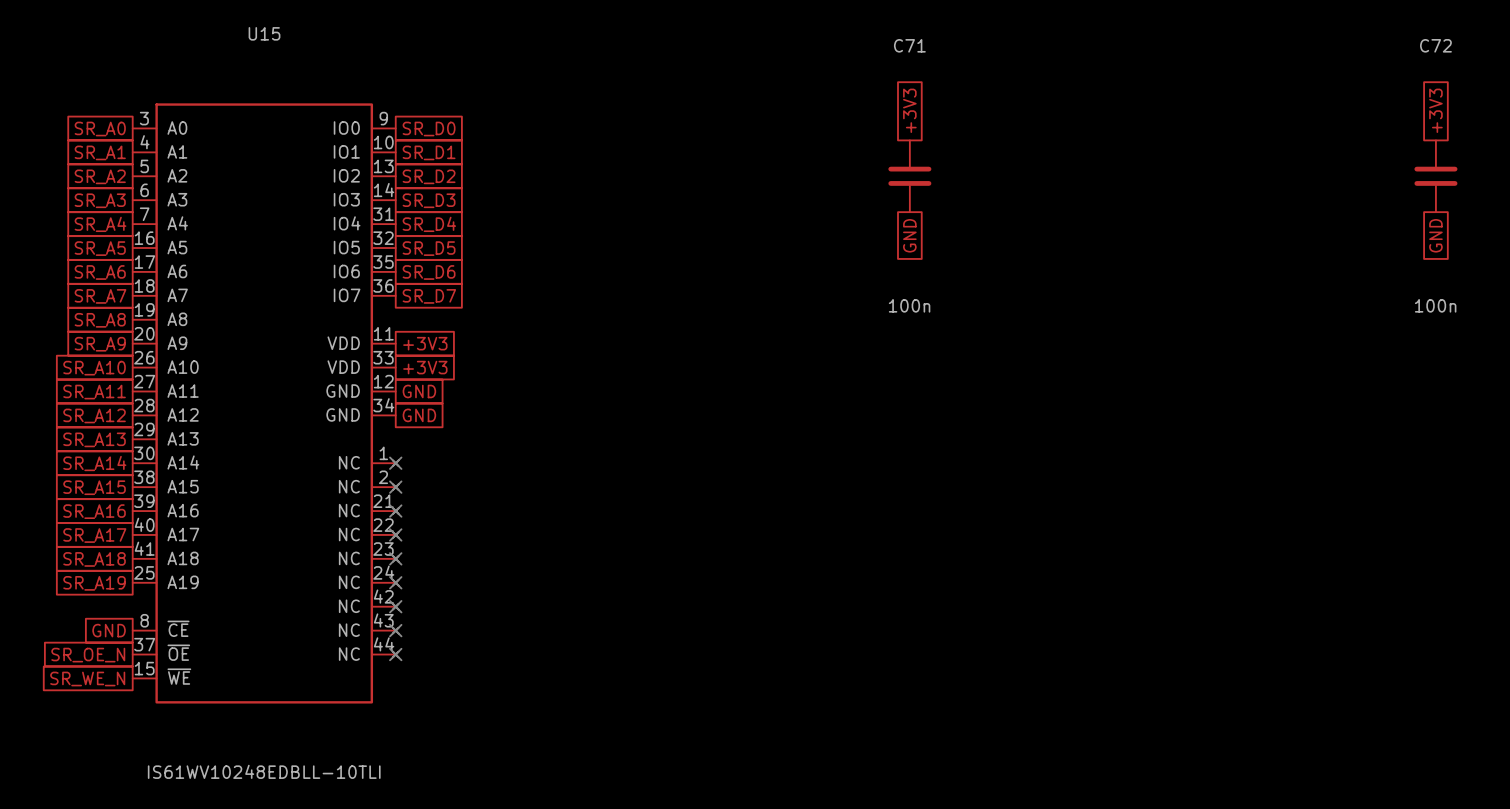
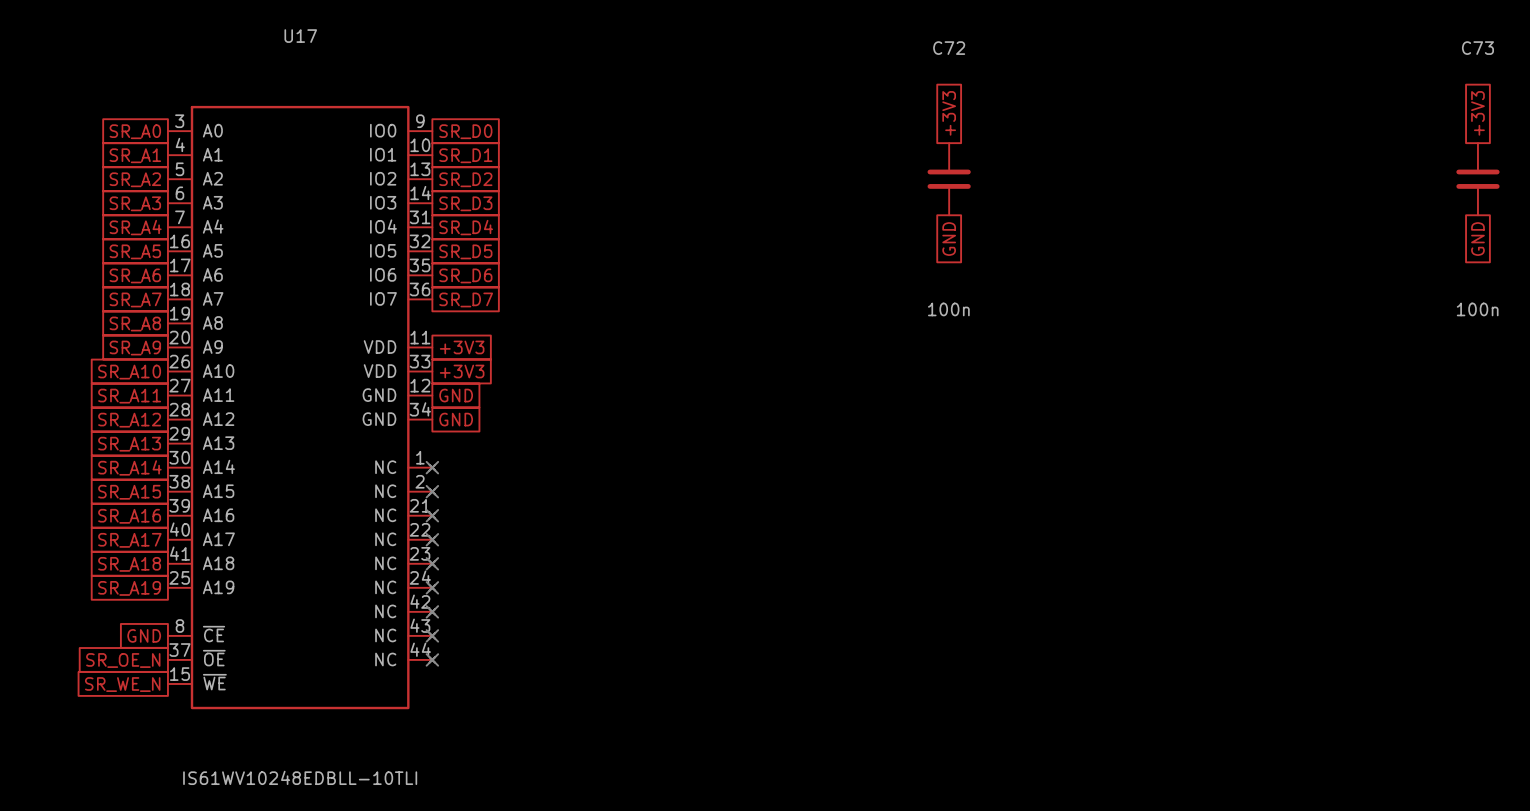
U15 name: U15 (264, 33) -> U17 (300, 36)
C71 name: C71 (909, 45) -> C72 (949, 48)
C72 name: C72 (1435, 45) -> C73 (1477, 48)

